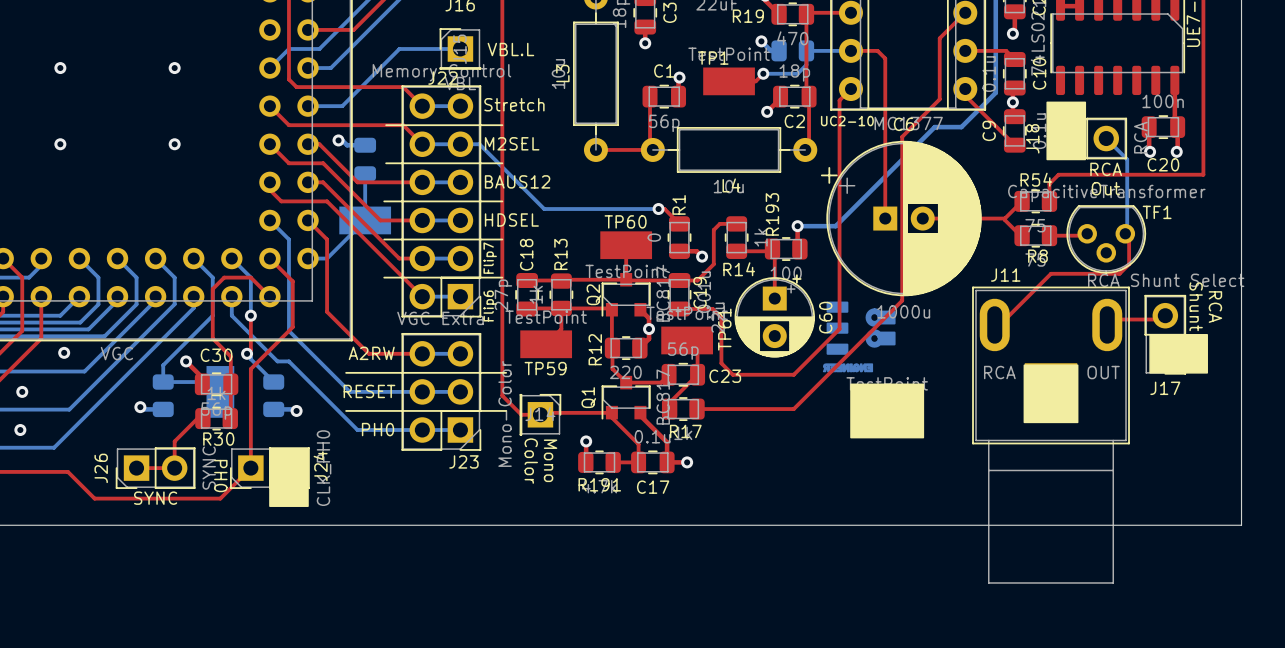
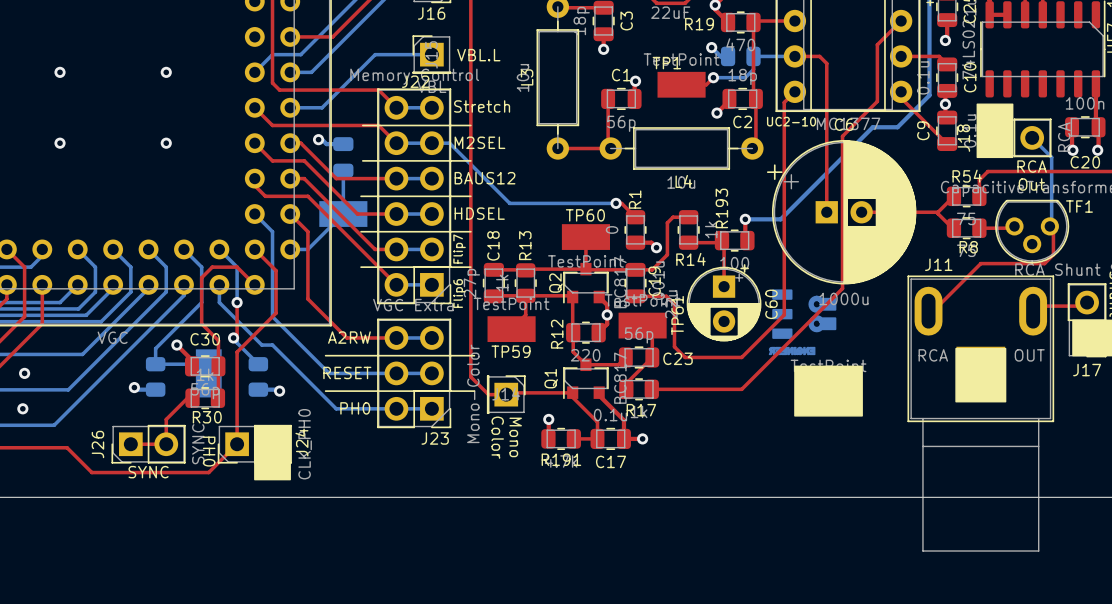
via: (64, 352) -> none

